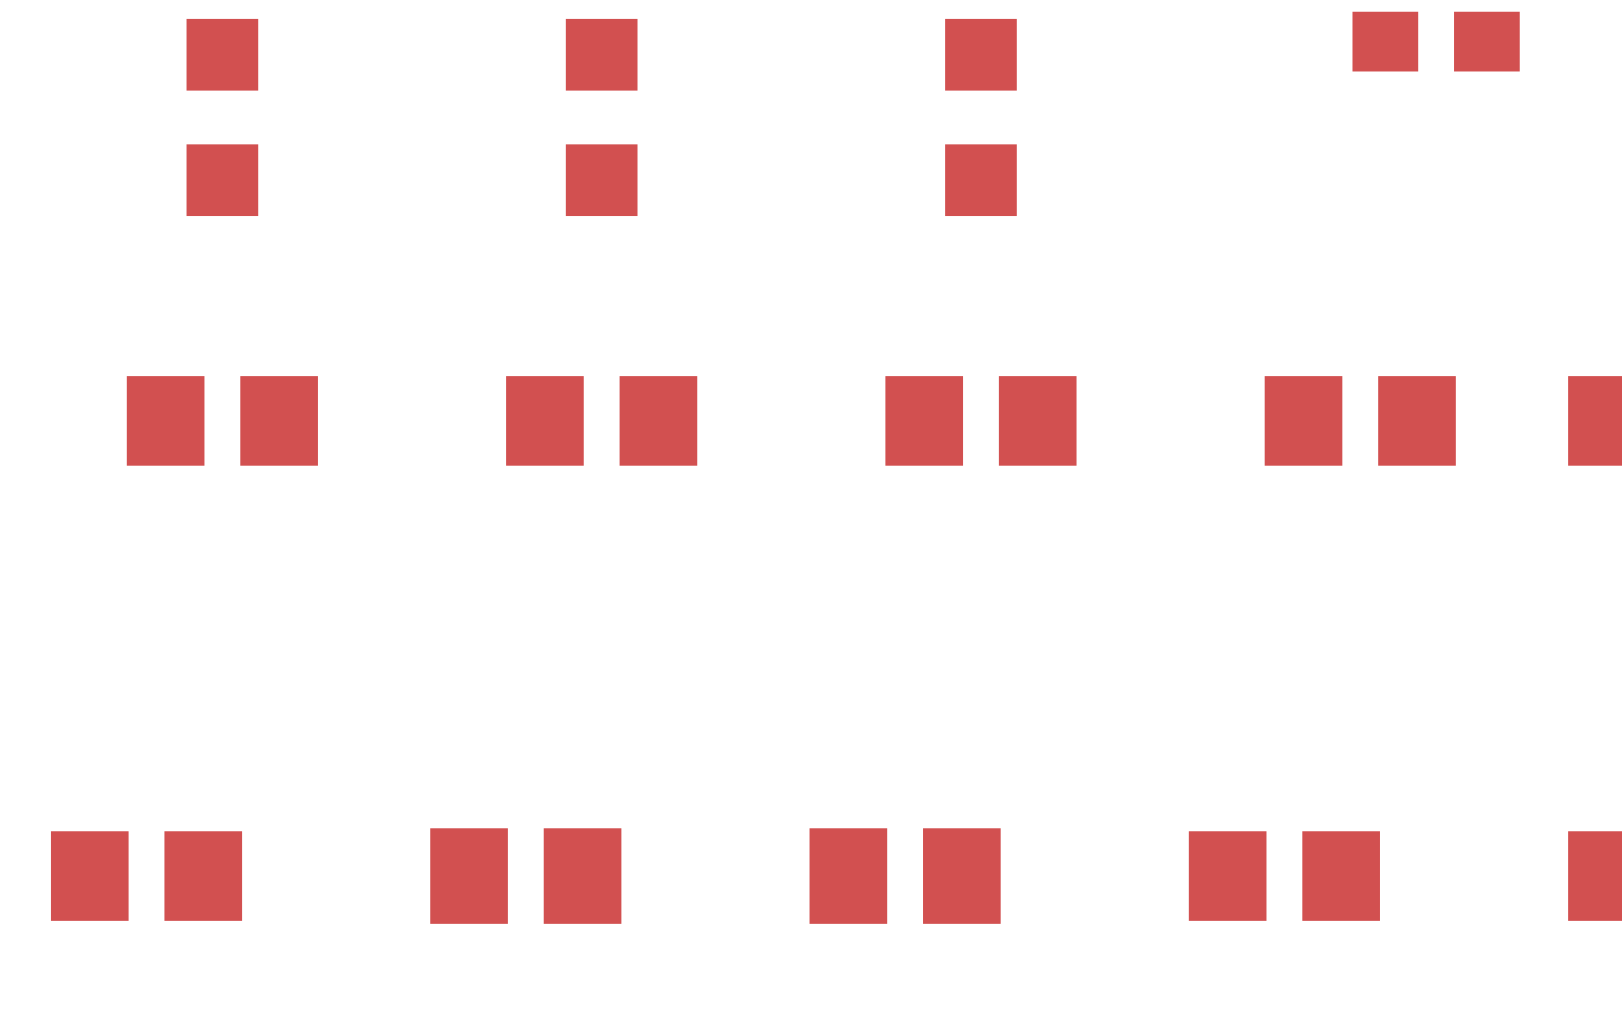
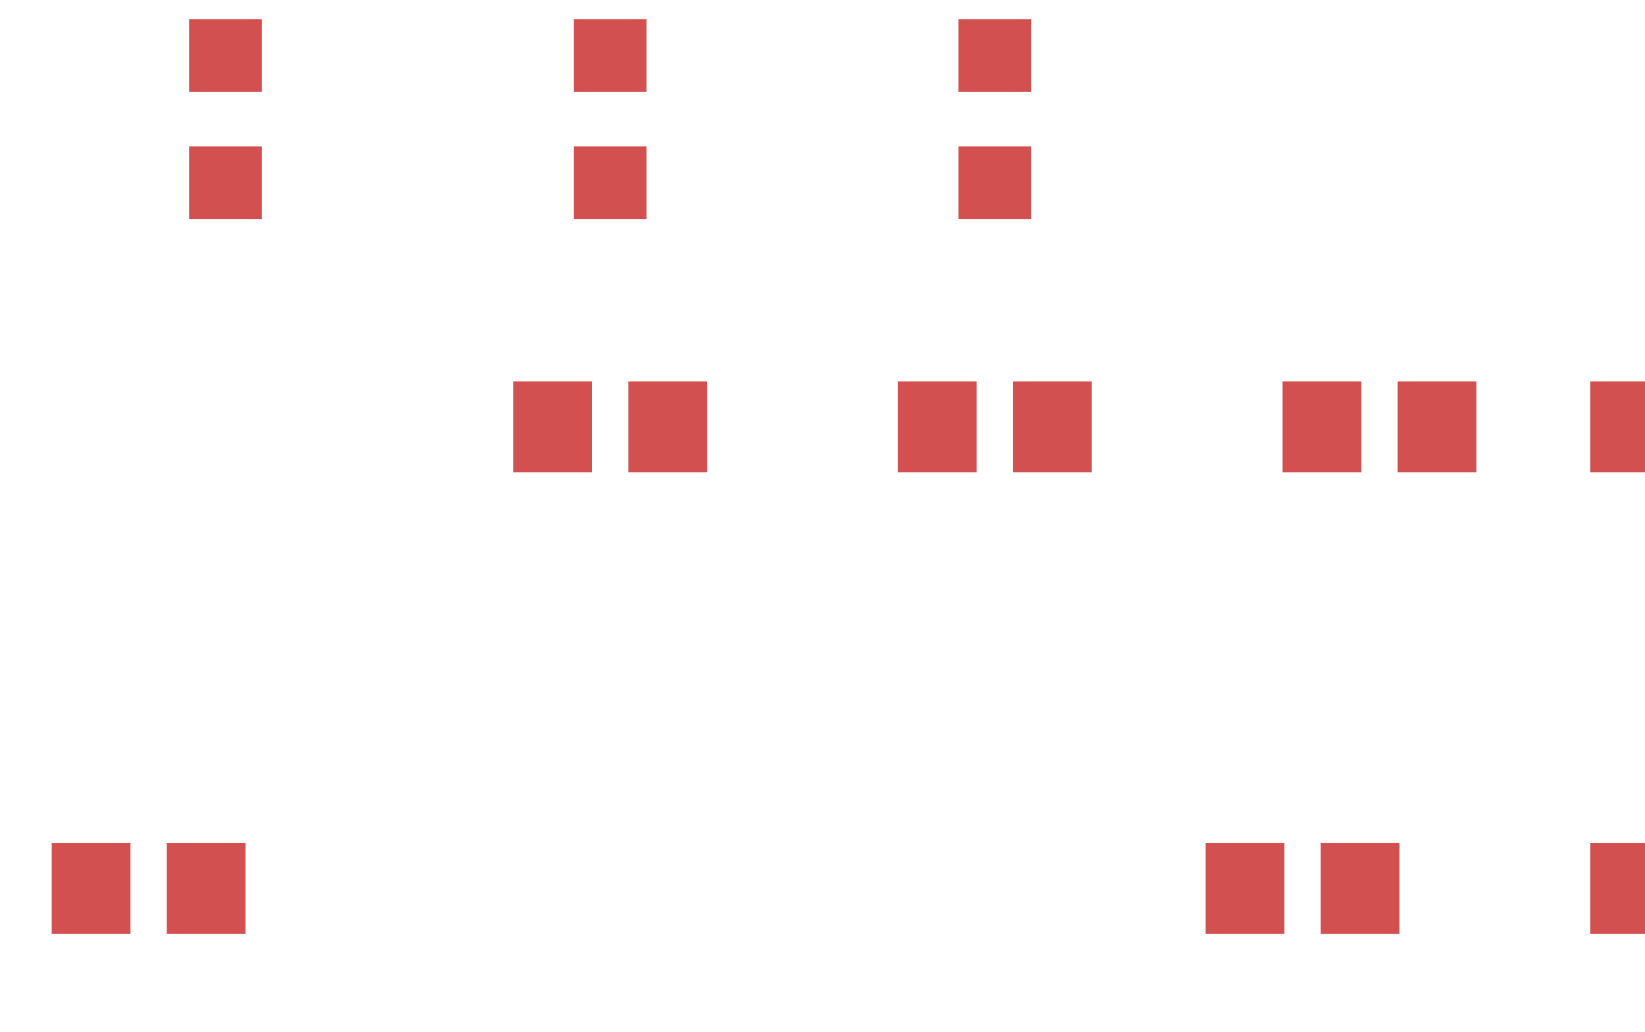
part: (1436, 41) -> none
part: (222, 420) -> none
part: (525, 876) -> none
part: (905, 876) -> none

